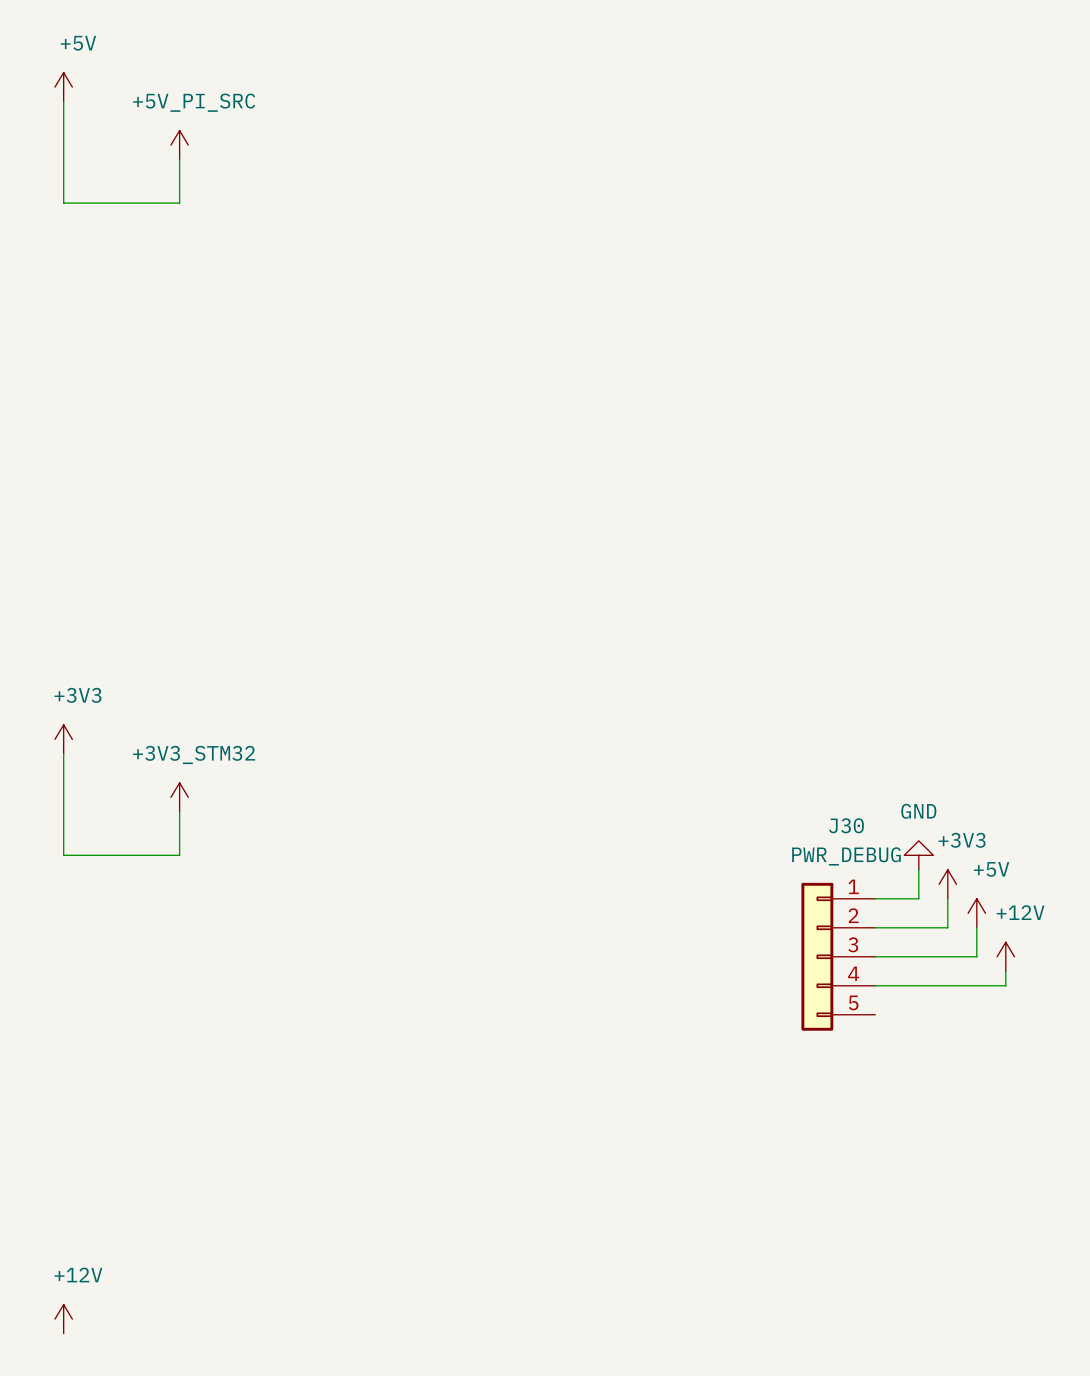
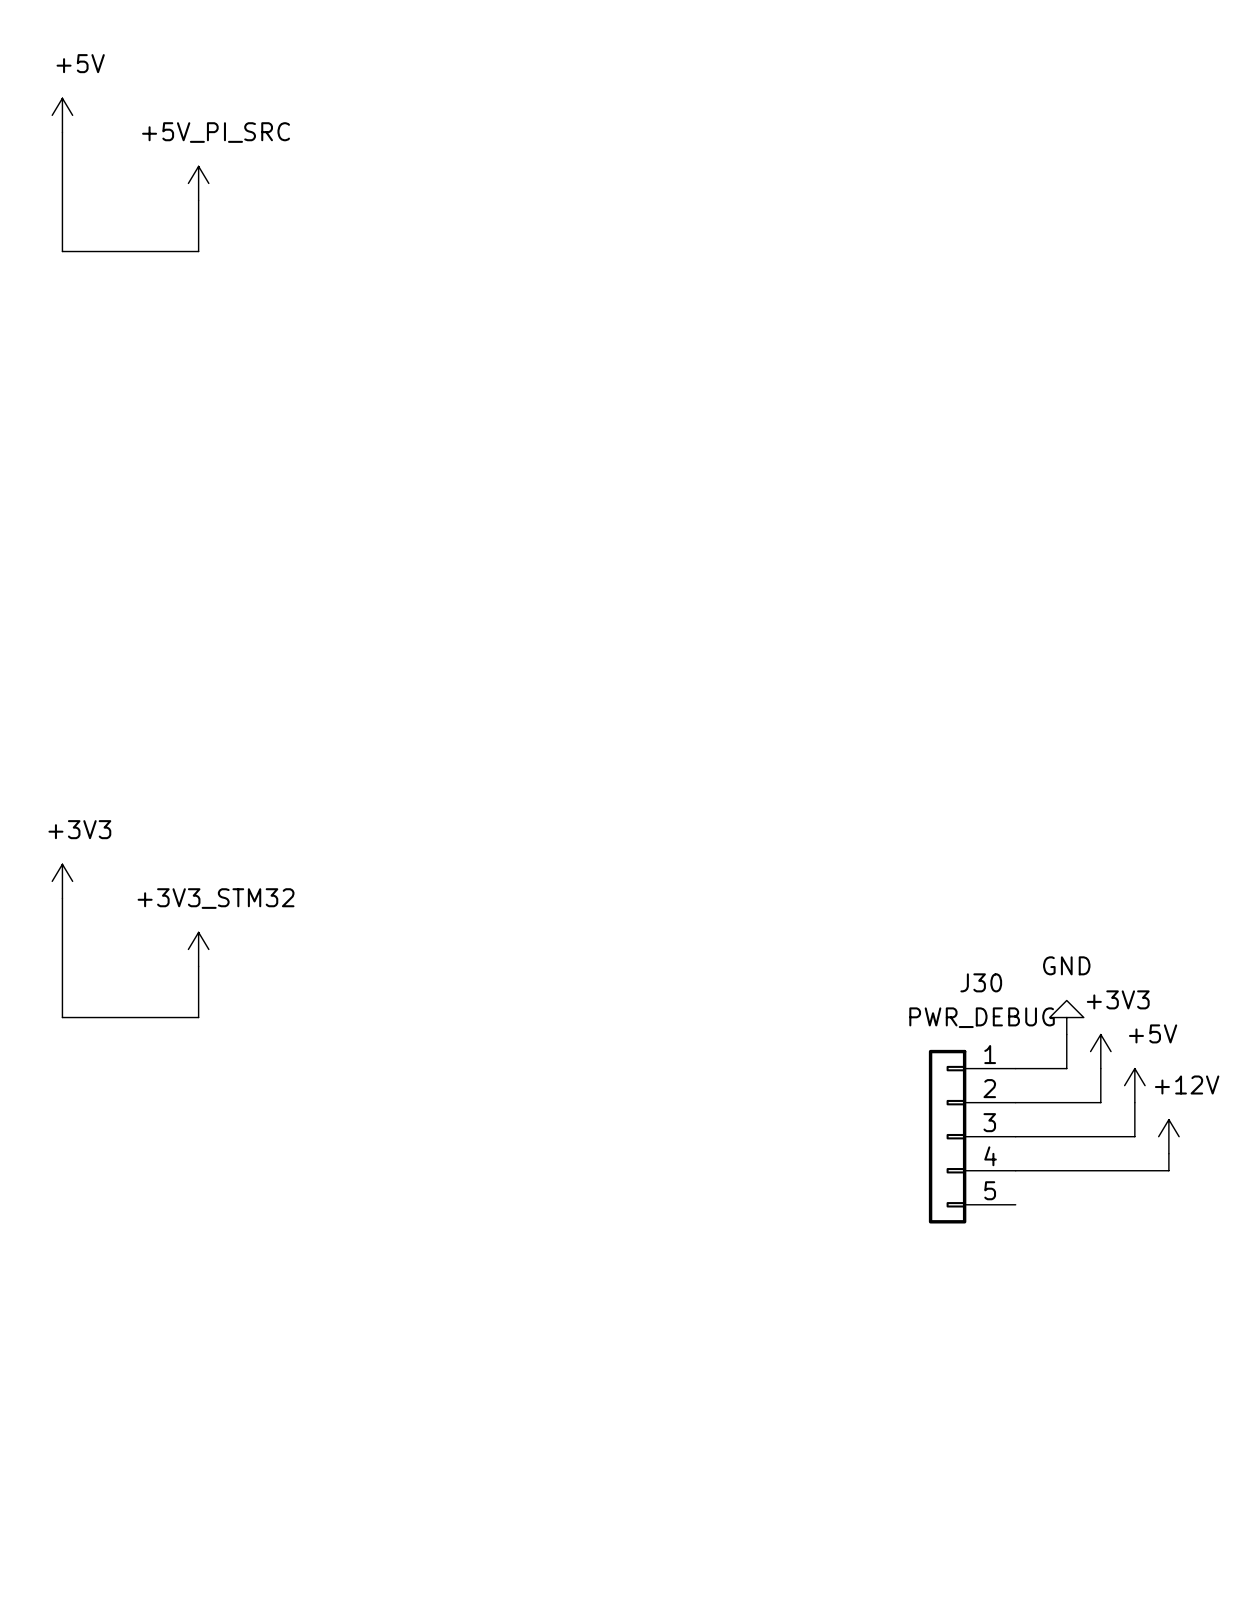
power symbol: +12V (63, 1319) -> none

